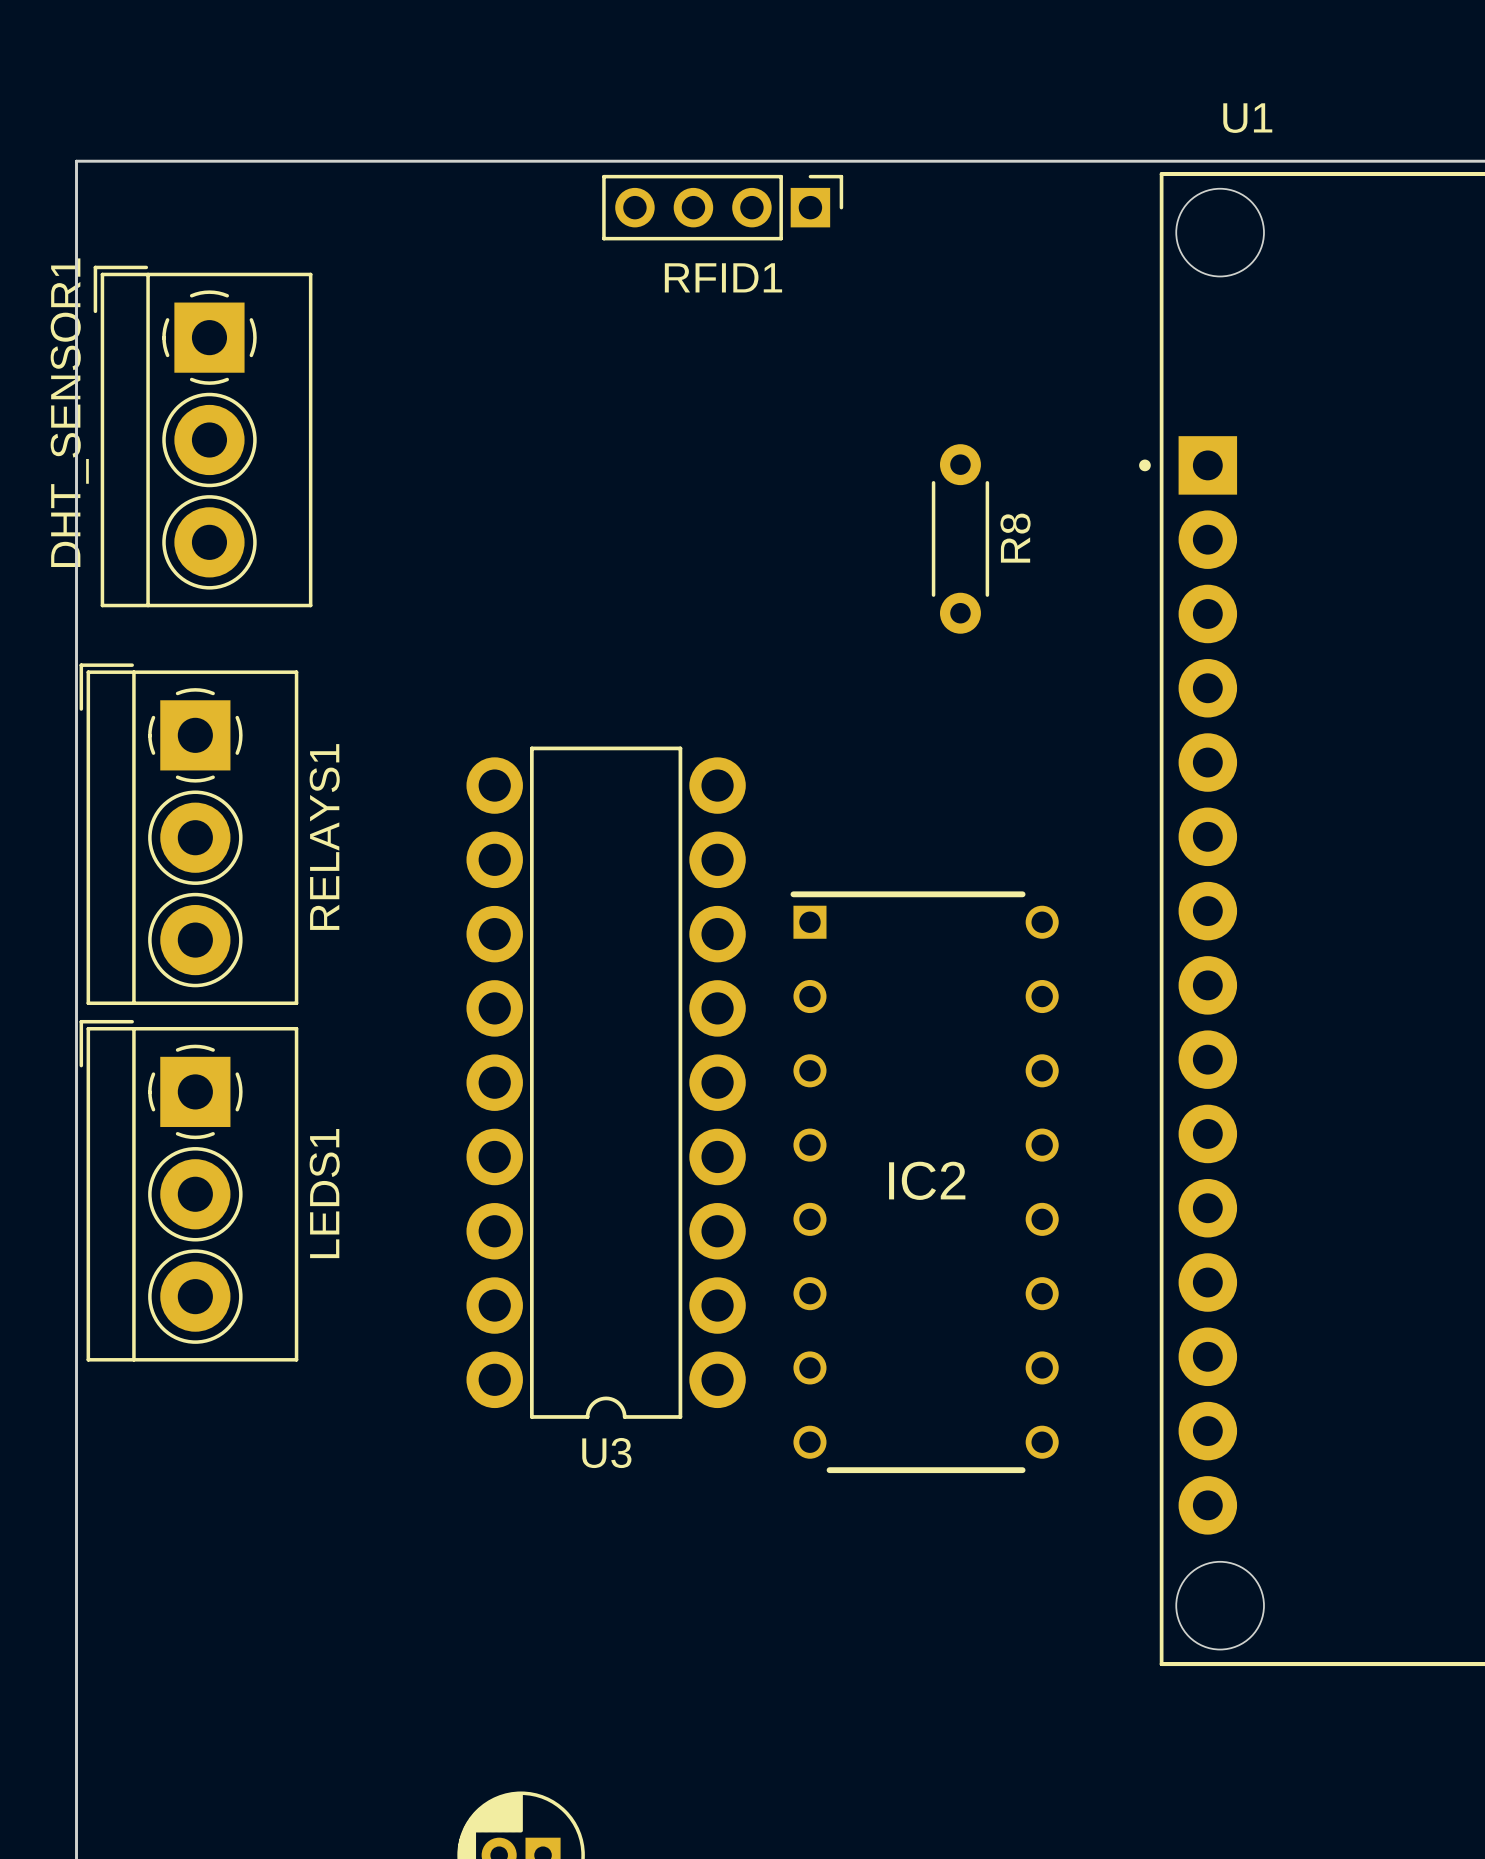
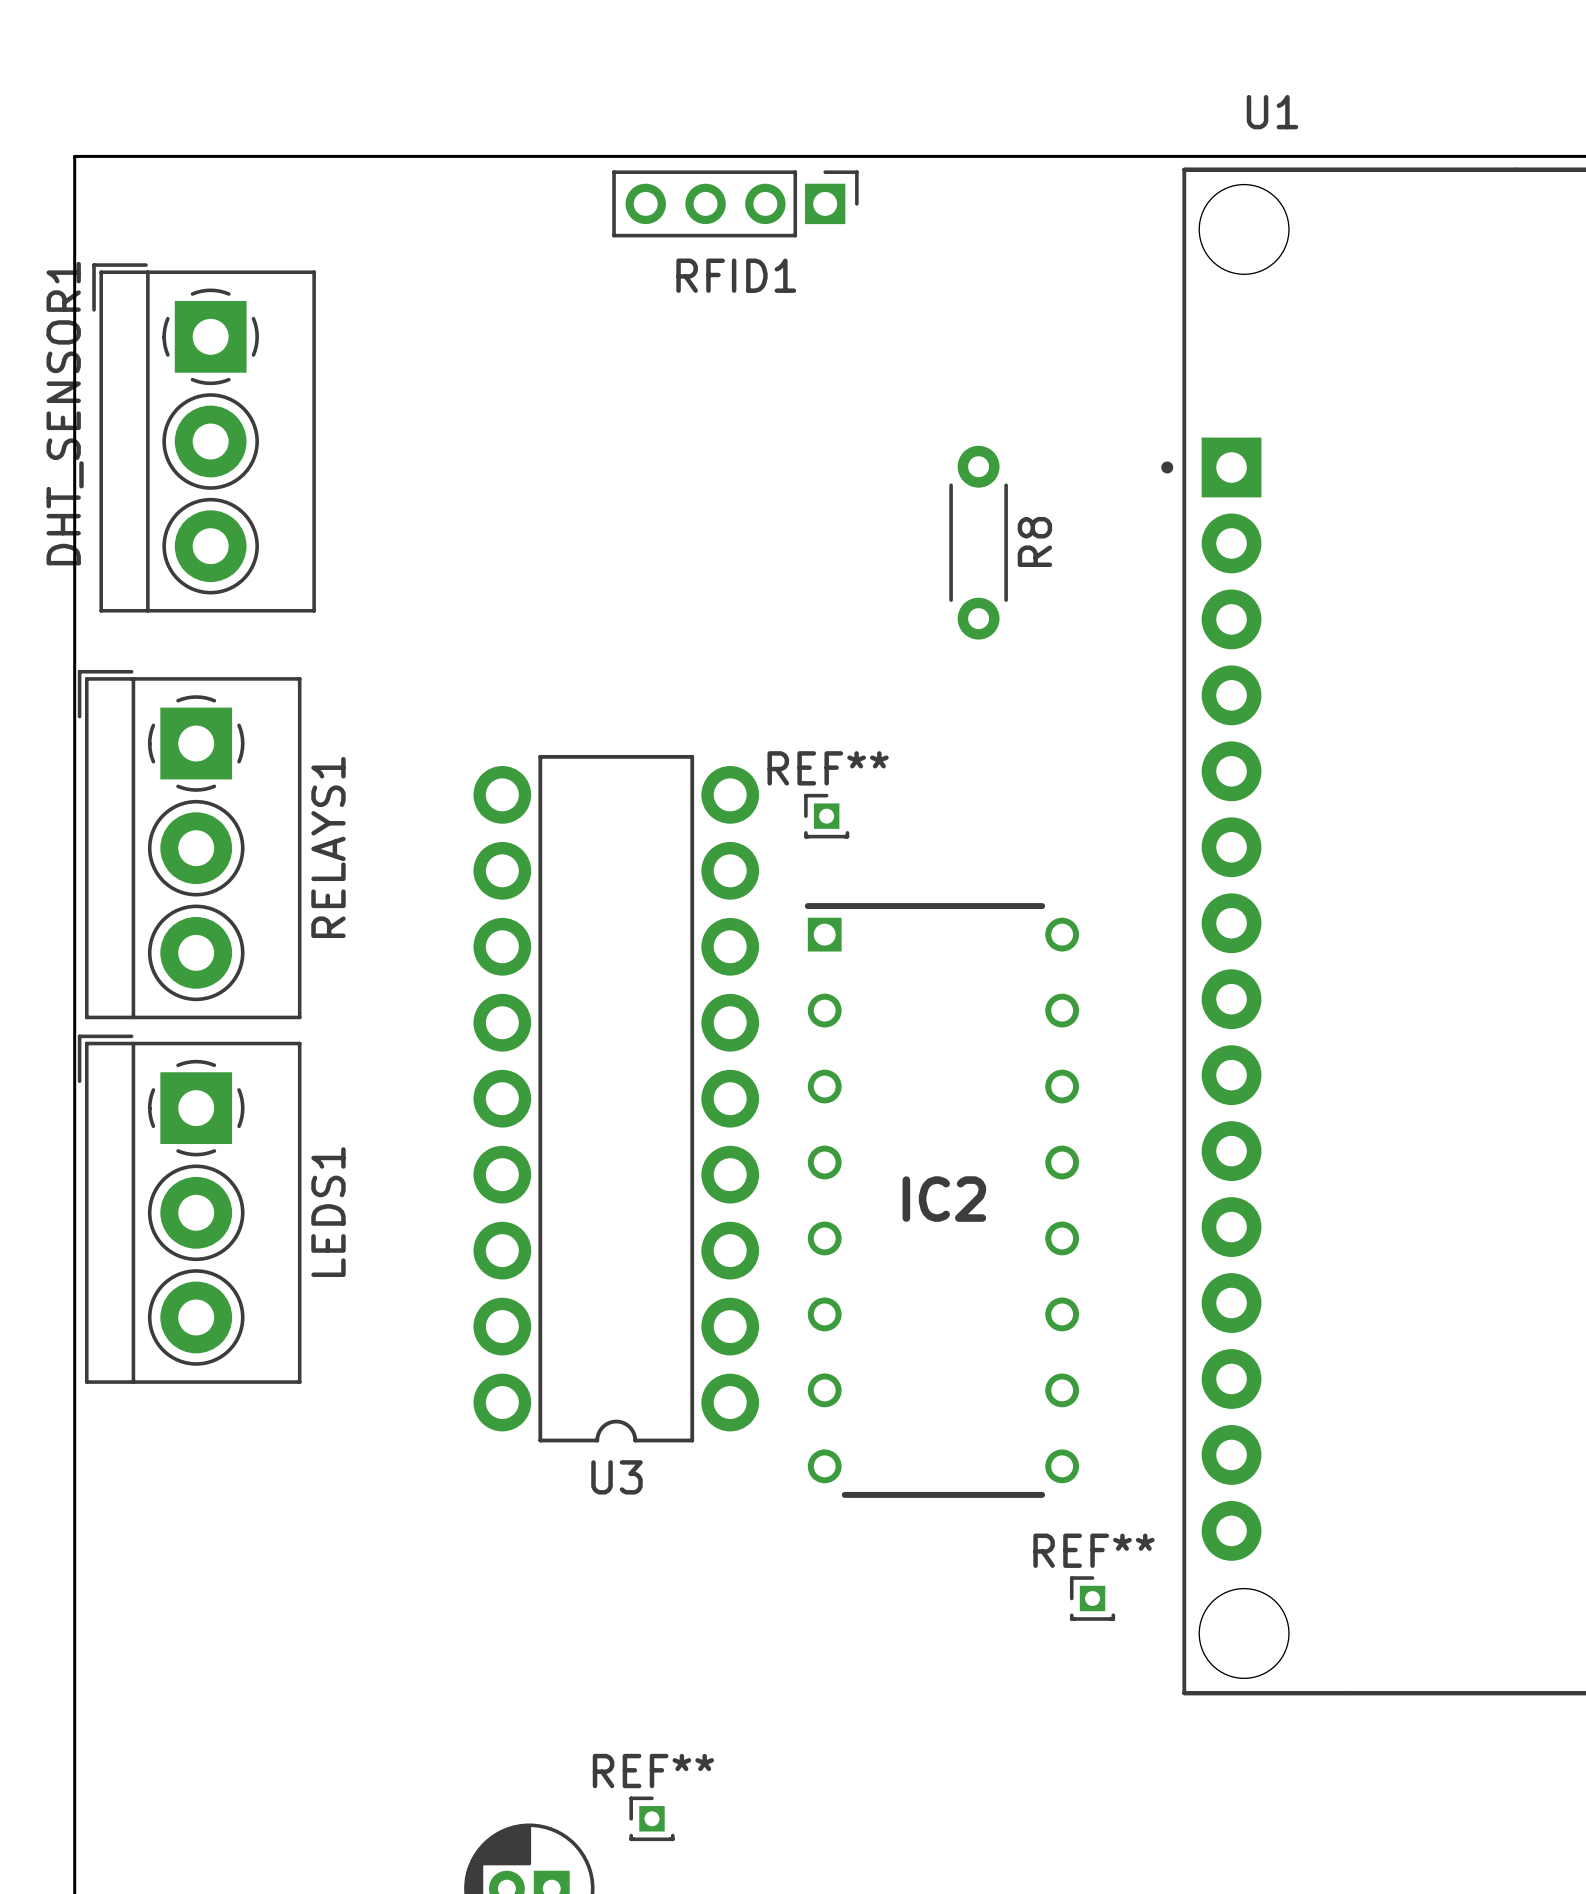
REF**: none -> (826, 816)
REF**: none -> (1092, 1598)
REF**: none -> (651, 1818)

